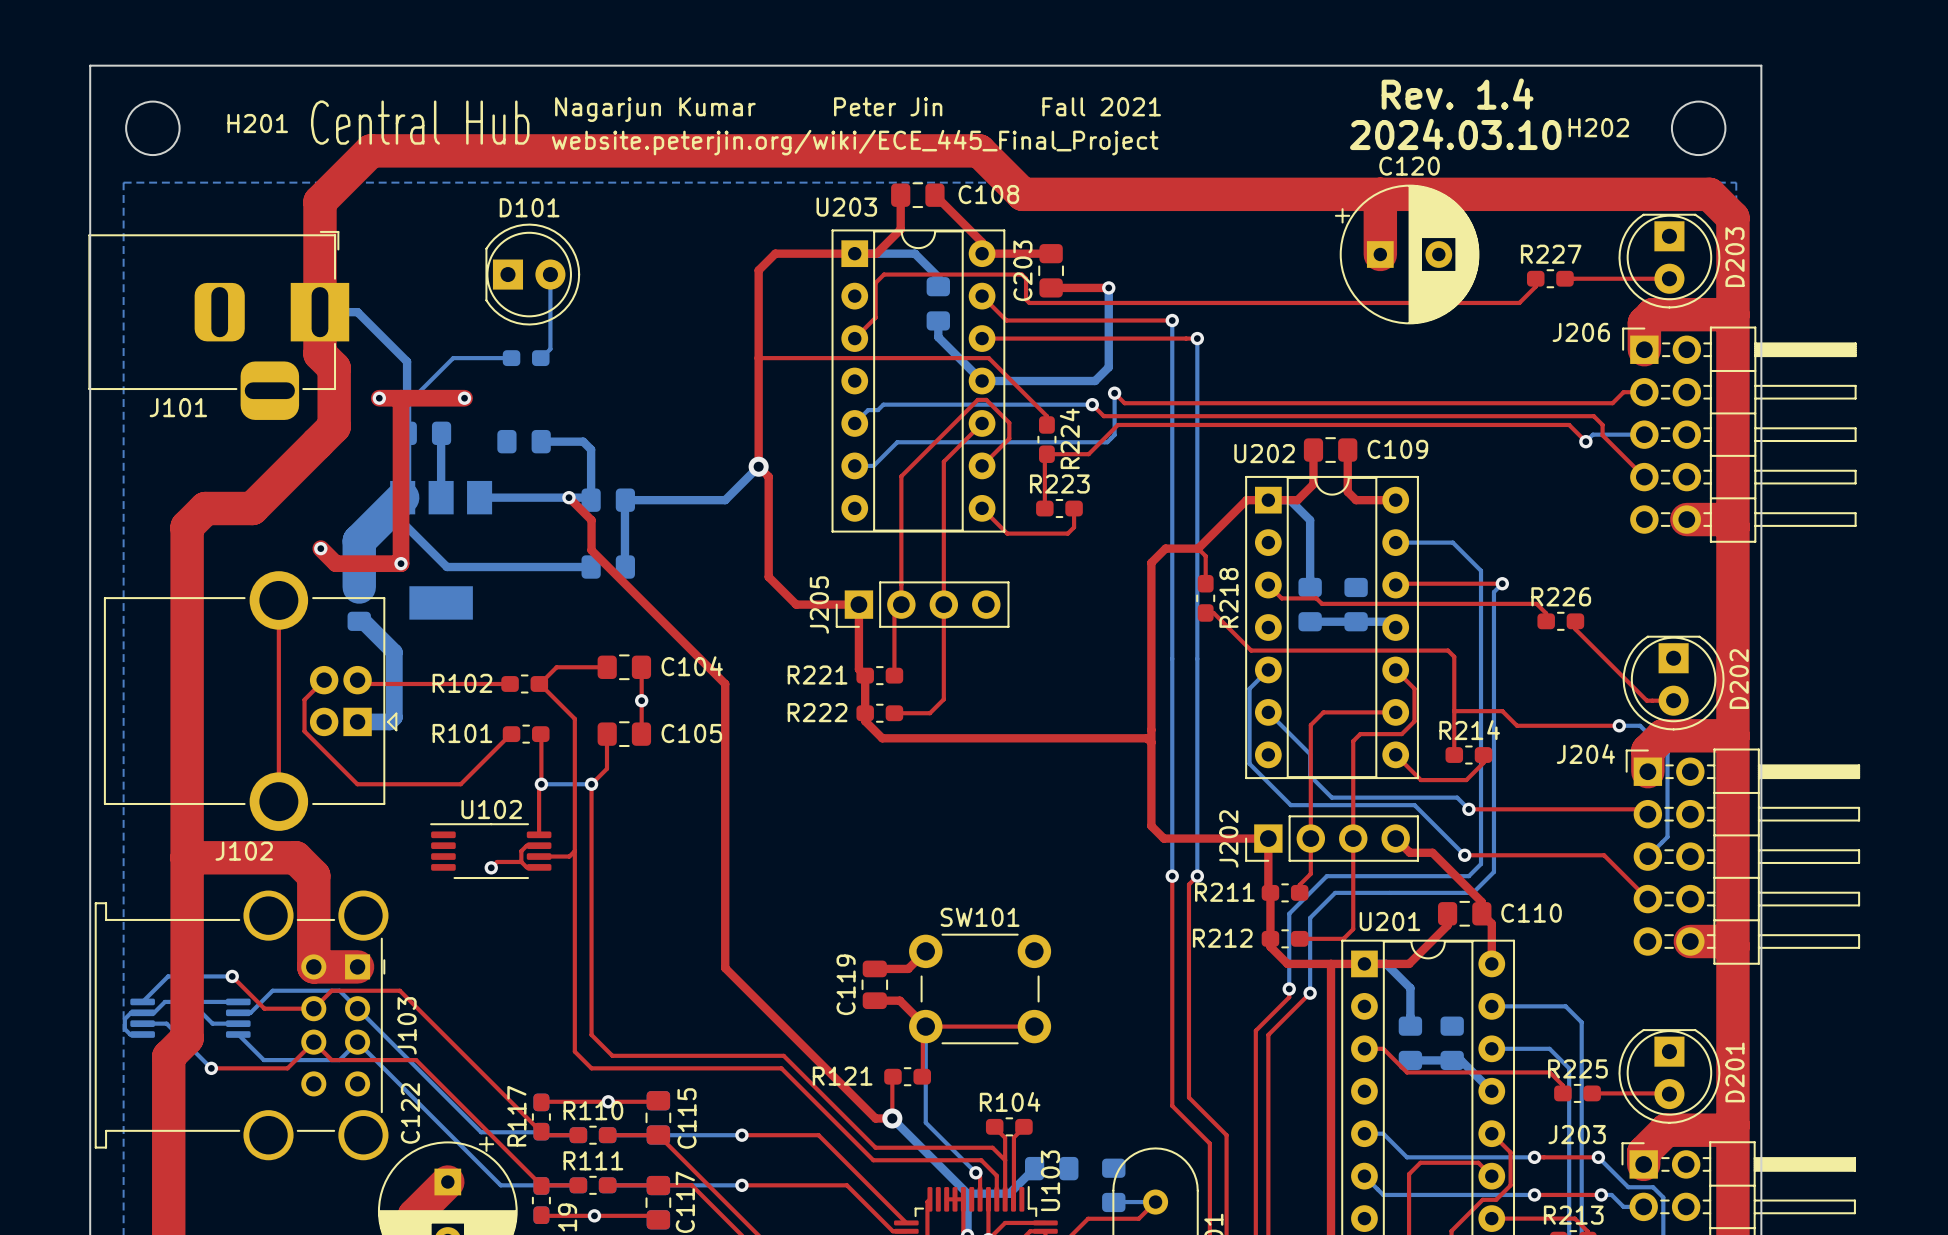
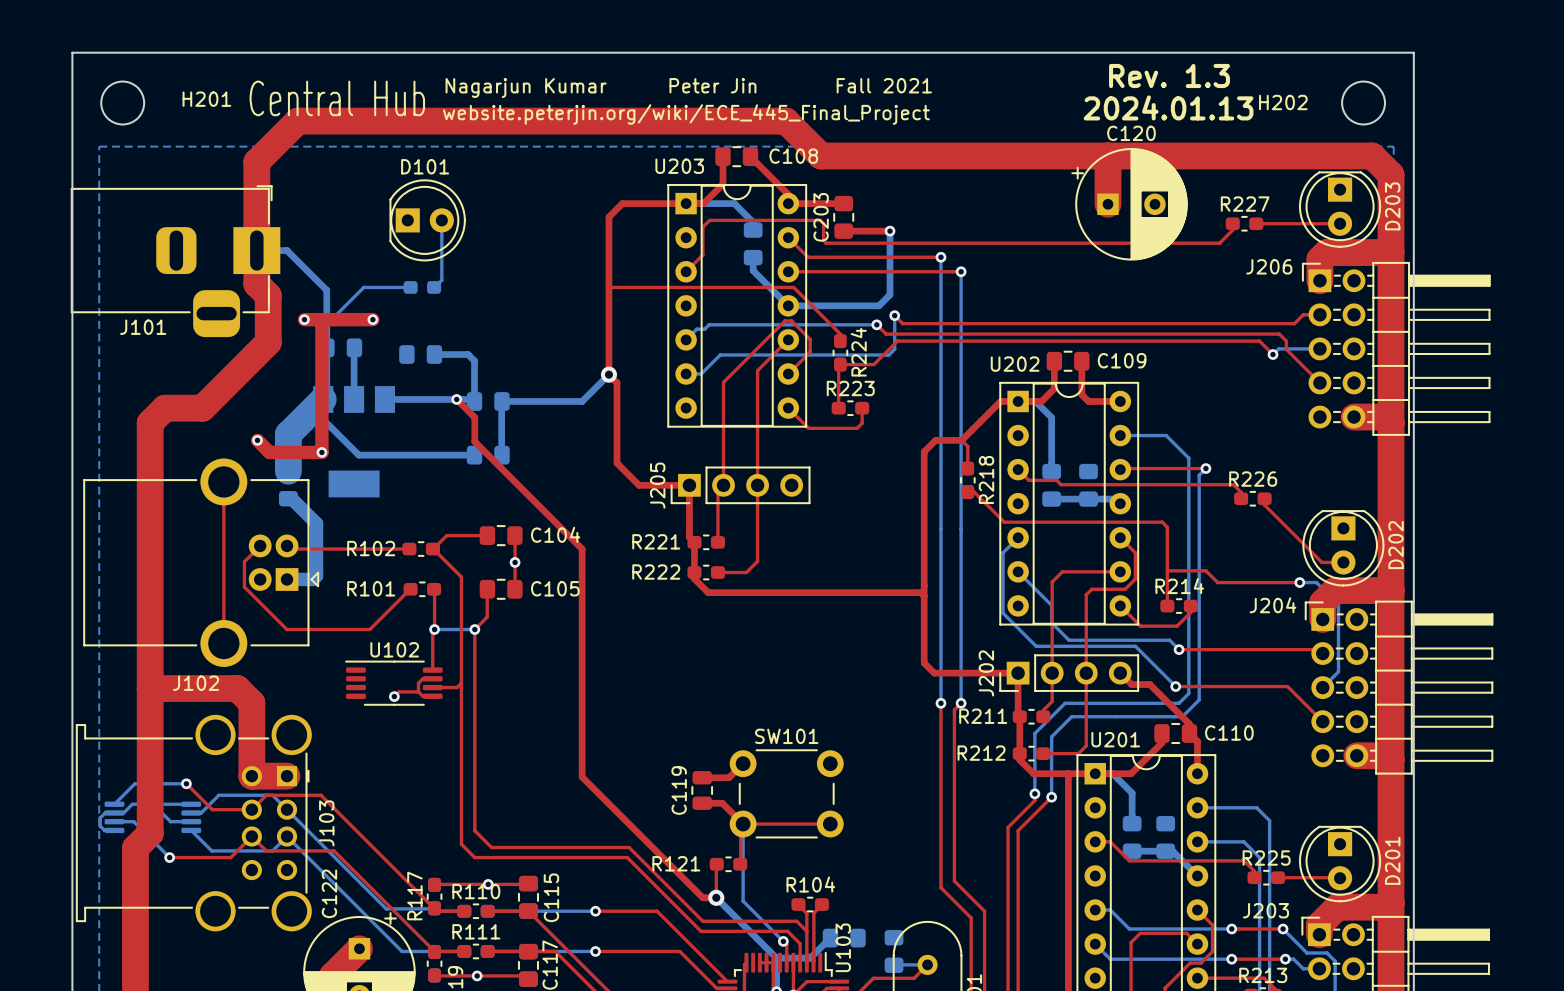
text: Rev. 1.4 (1457, 94) -> Rev. 1.3 (1169, 76)
text: 2024.03.10 (1455, 134) -> 2024.01.13 (1168, 107)

